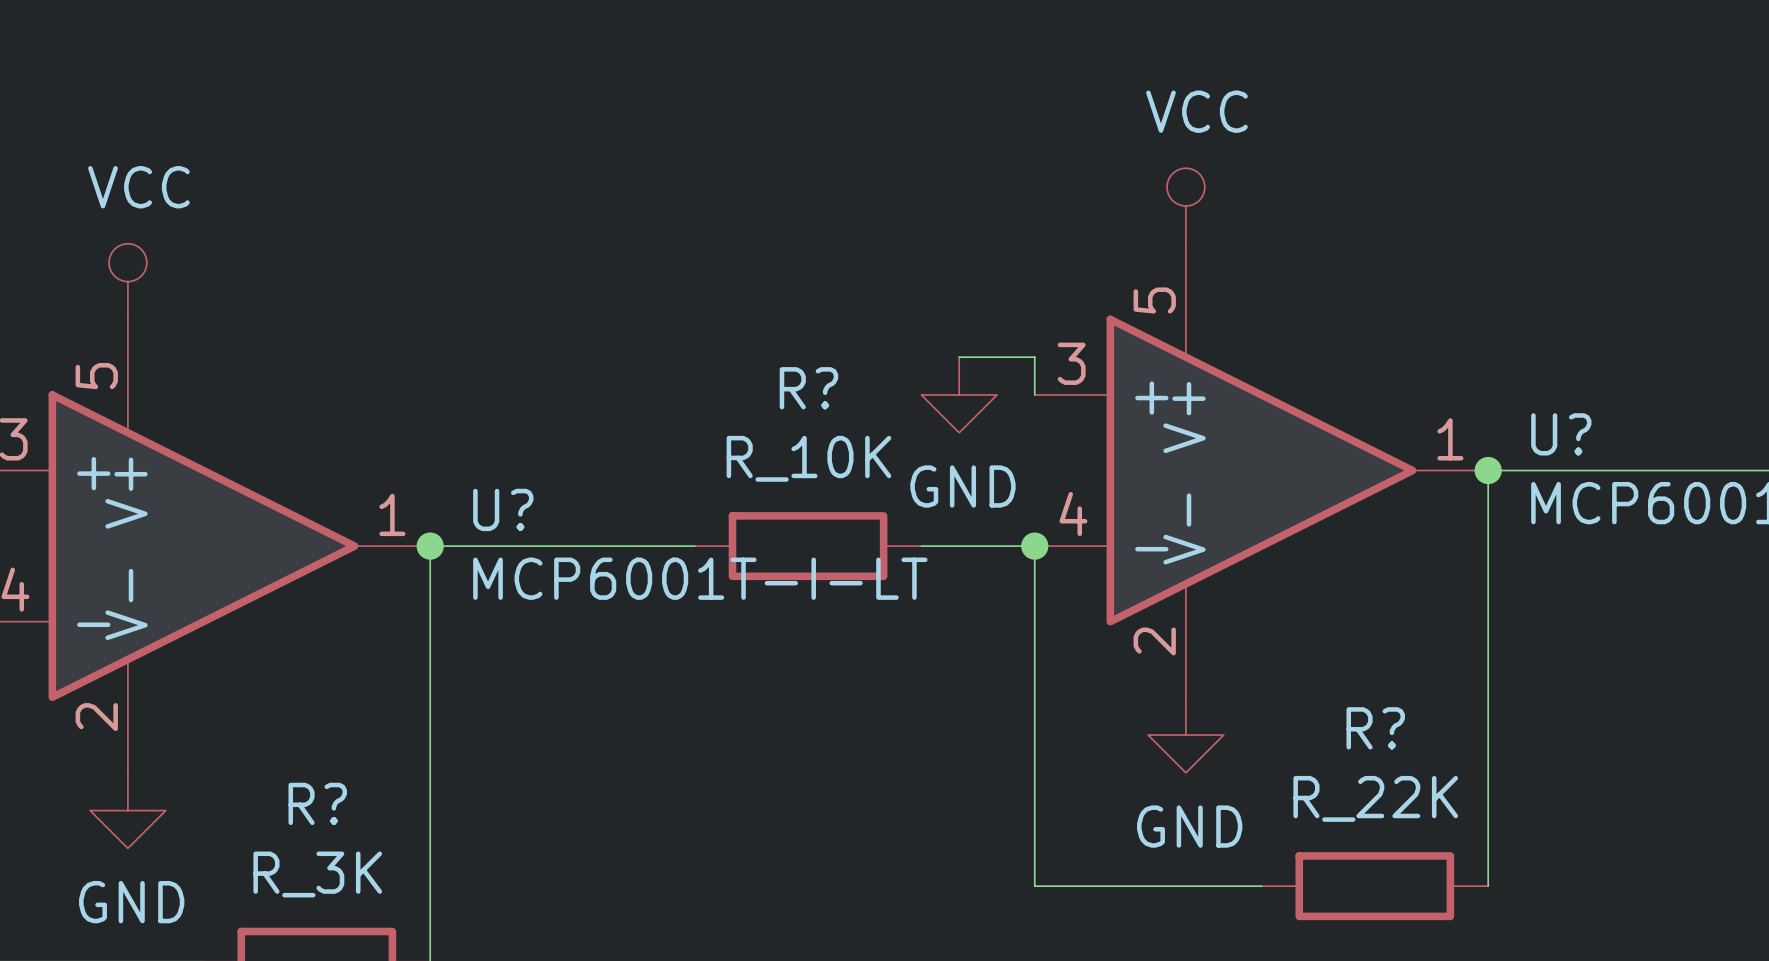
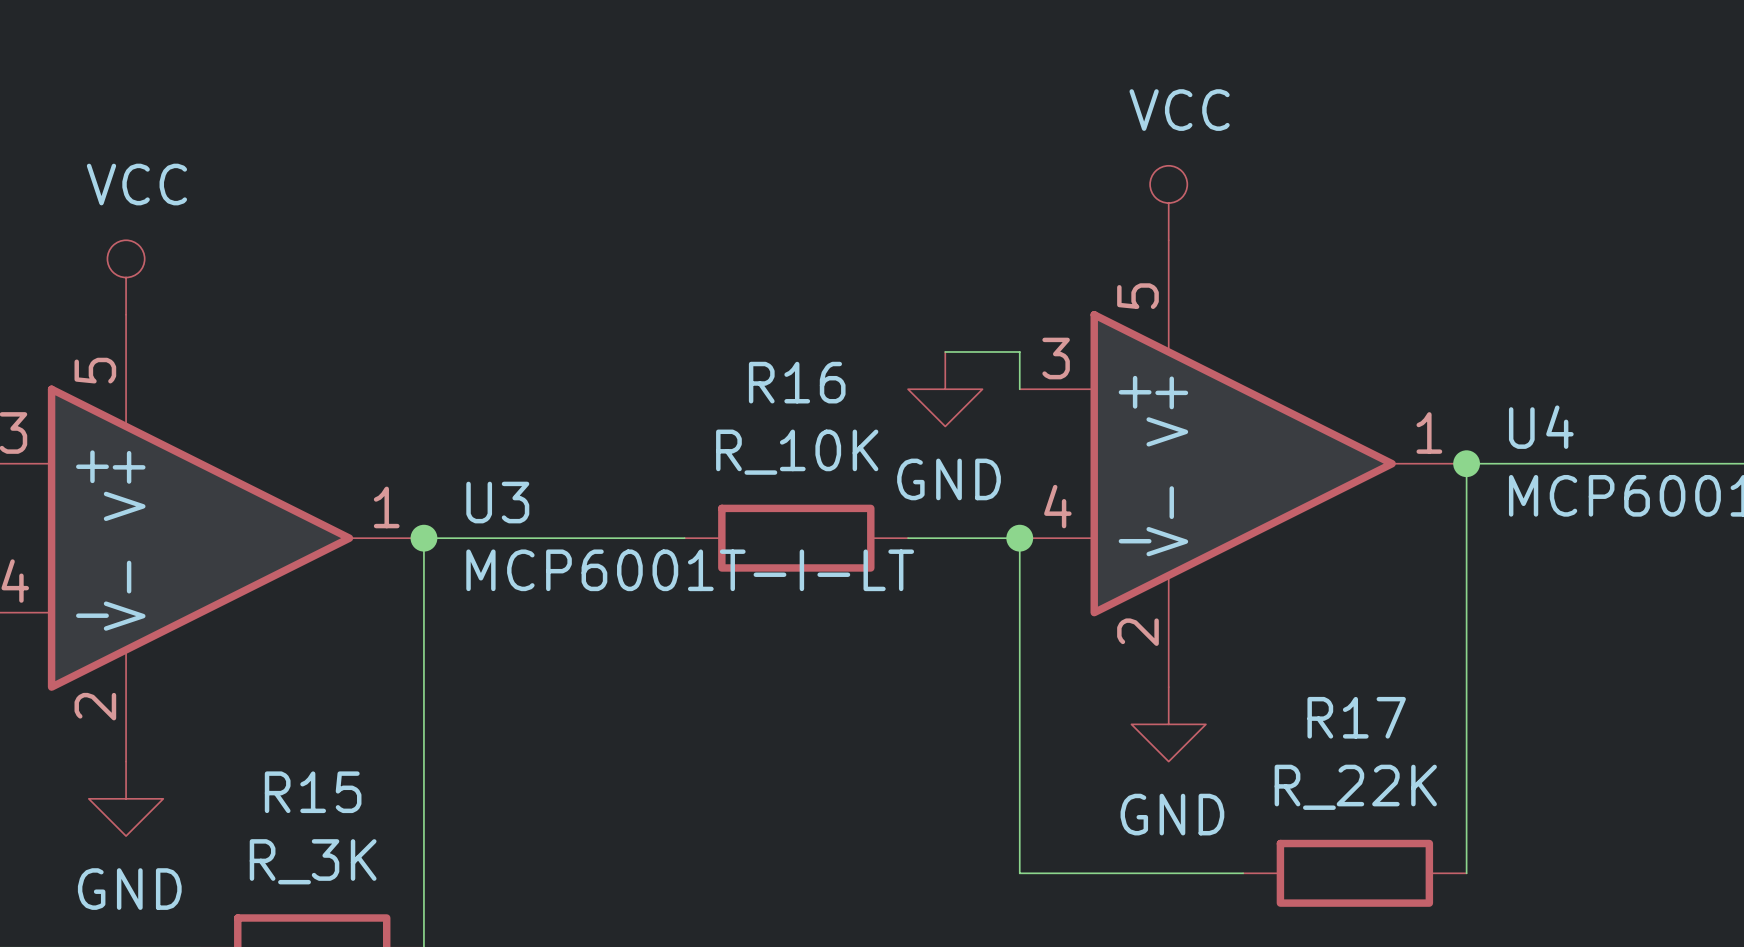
R? name: R? (808, 388) -> R16 (797, 382)
U? name: U? (1561, 434) -> U4 (1541, 427)
U? name: U? (503, 509) -> U3 (497, 502)
R? name: R? (1375, 728) -> R17 (1356, 717)
R? name: R? (317, 803) -> R15 (313, 792)

